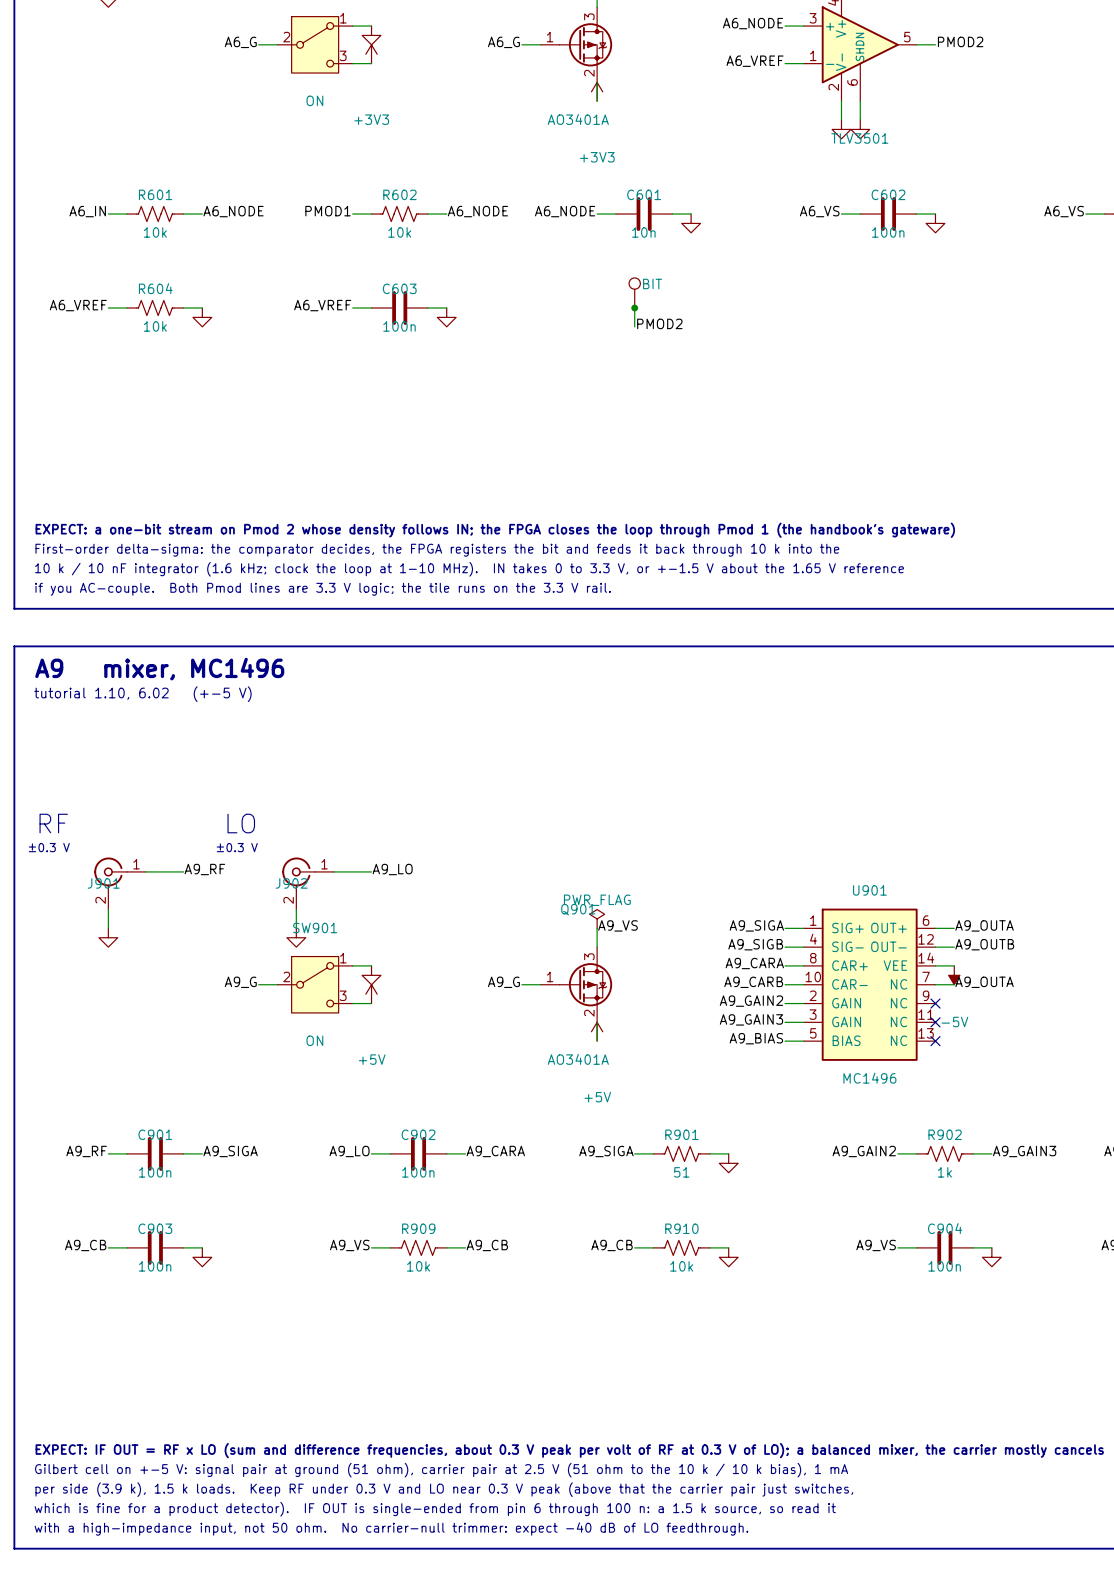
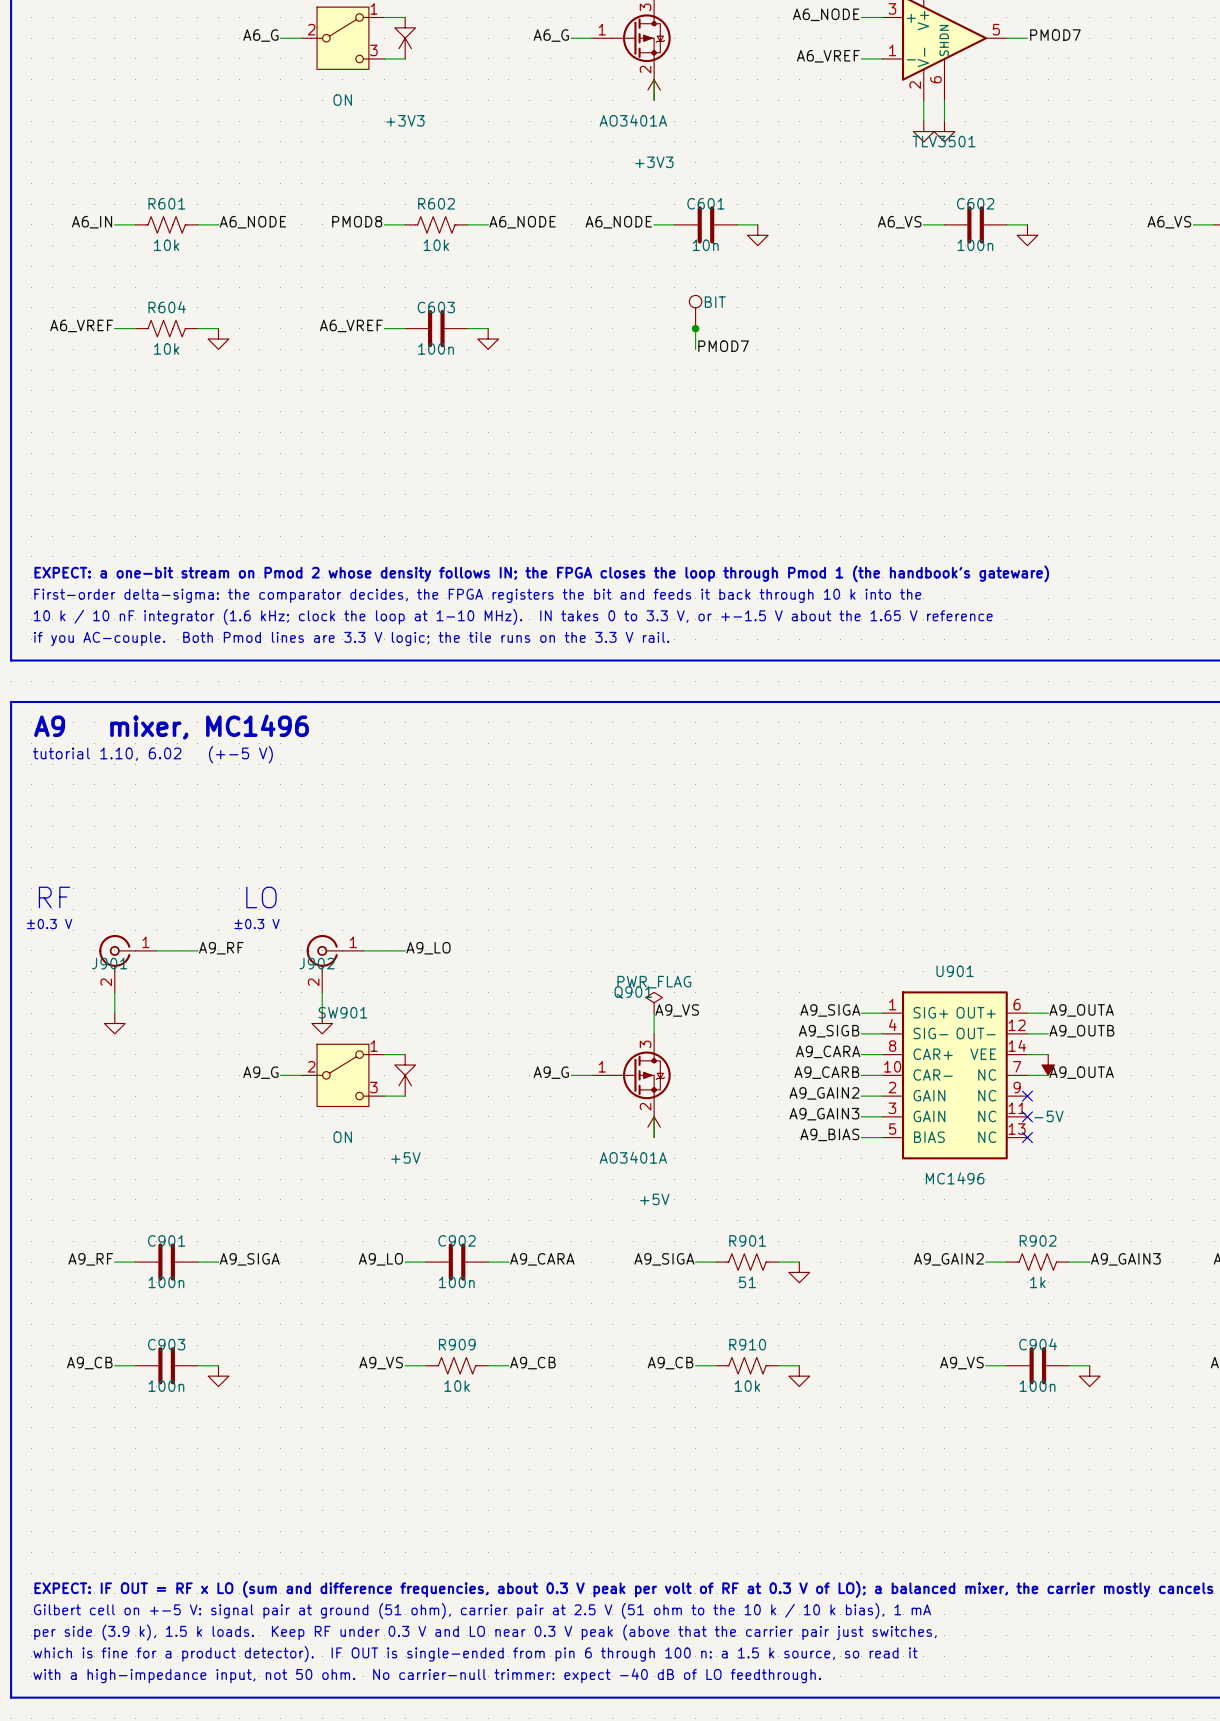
label: PMOD2 (960, 41) -> PMOD7 (1055, 35)
label: PMOD1 (328, 211) -> PMOD8 (357, 221)
label: PMOD2 (659, 323) -> PMOD7 (723, 346)

